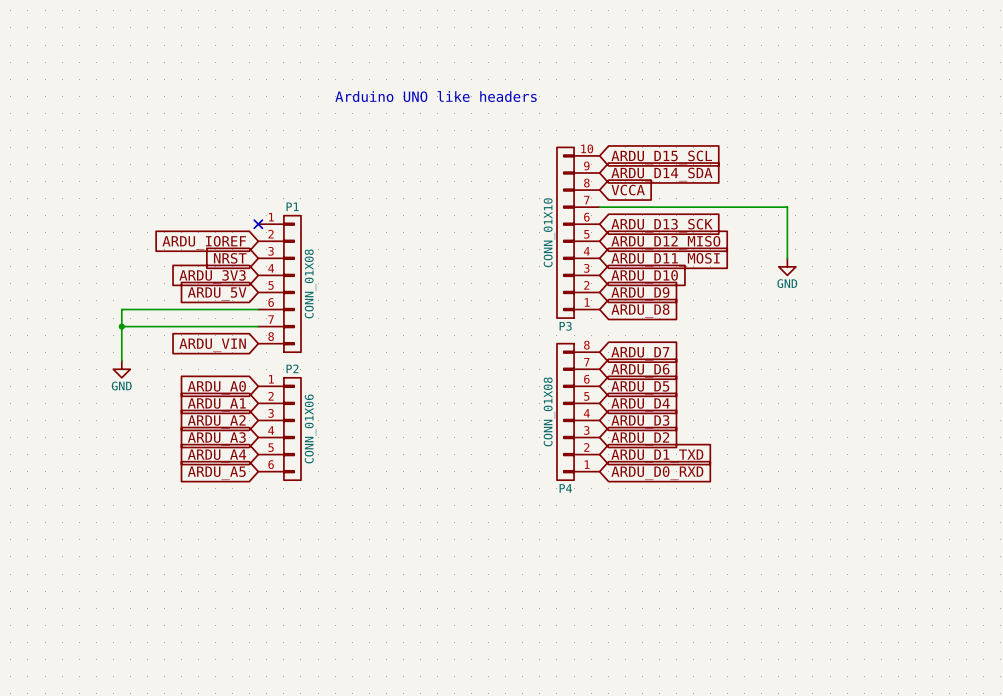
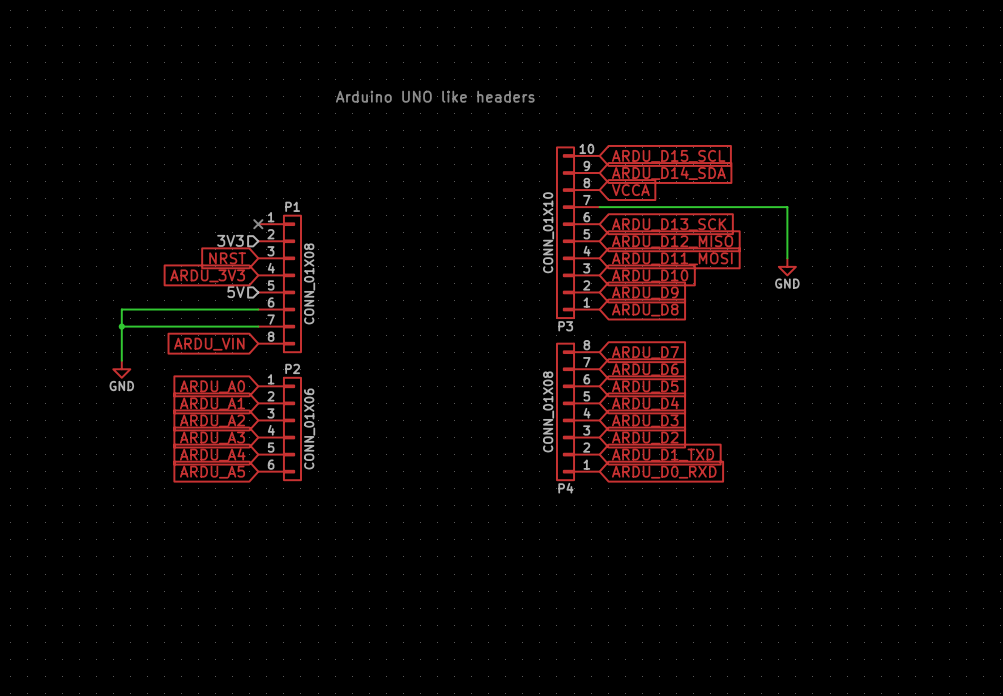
hierarchical label: none -> 3V3 (230, 240)
global label: ARDU_IOREF (204, 242) -> none
hierarchical label: none -> 5V (236, 292)
global label: ARDU_5V (217, 294) -> none

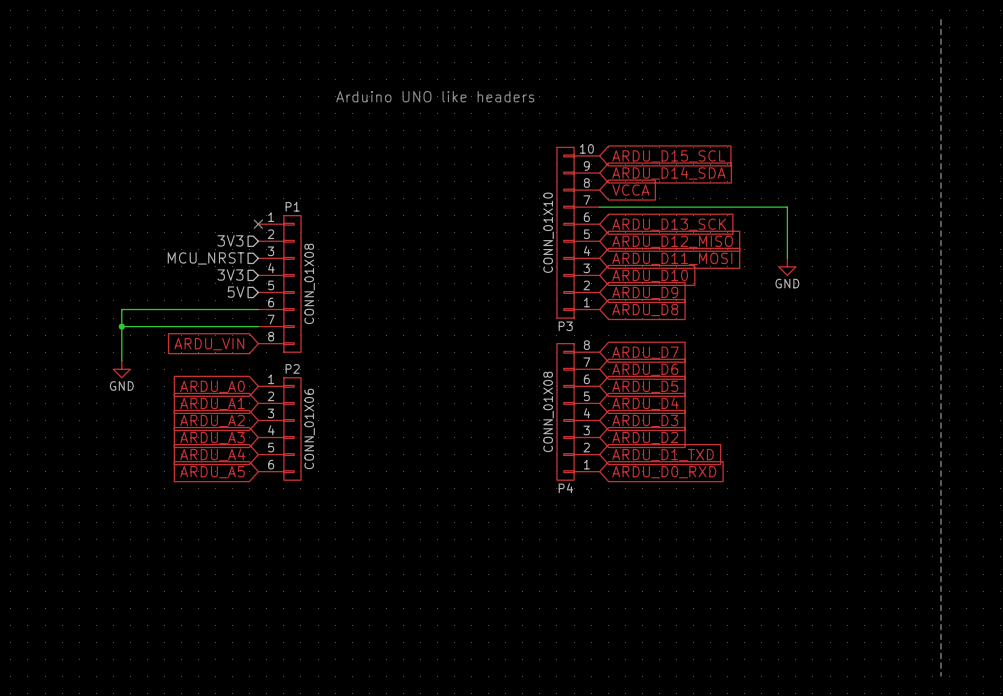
line: none -> (940, 19) (940, 676)
hierarchical label: none -> MCU_NRST (206, 258)
global label: NRST (227, 258) -> none
global label: ARDU_3V3 (207, 275) -> none
hierarchical label: none -> 3V3 (230, 275)

